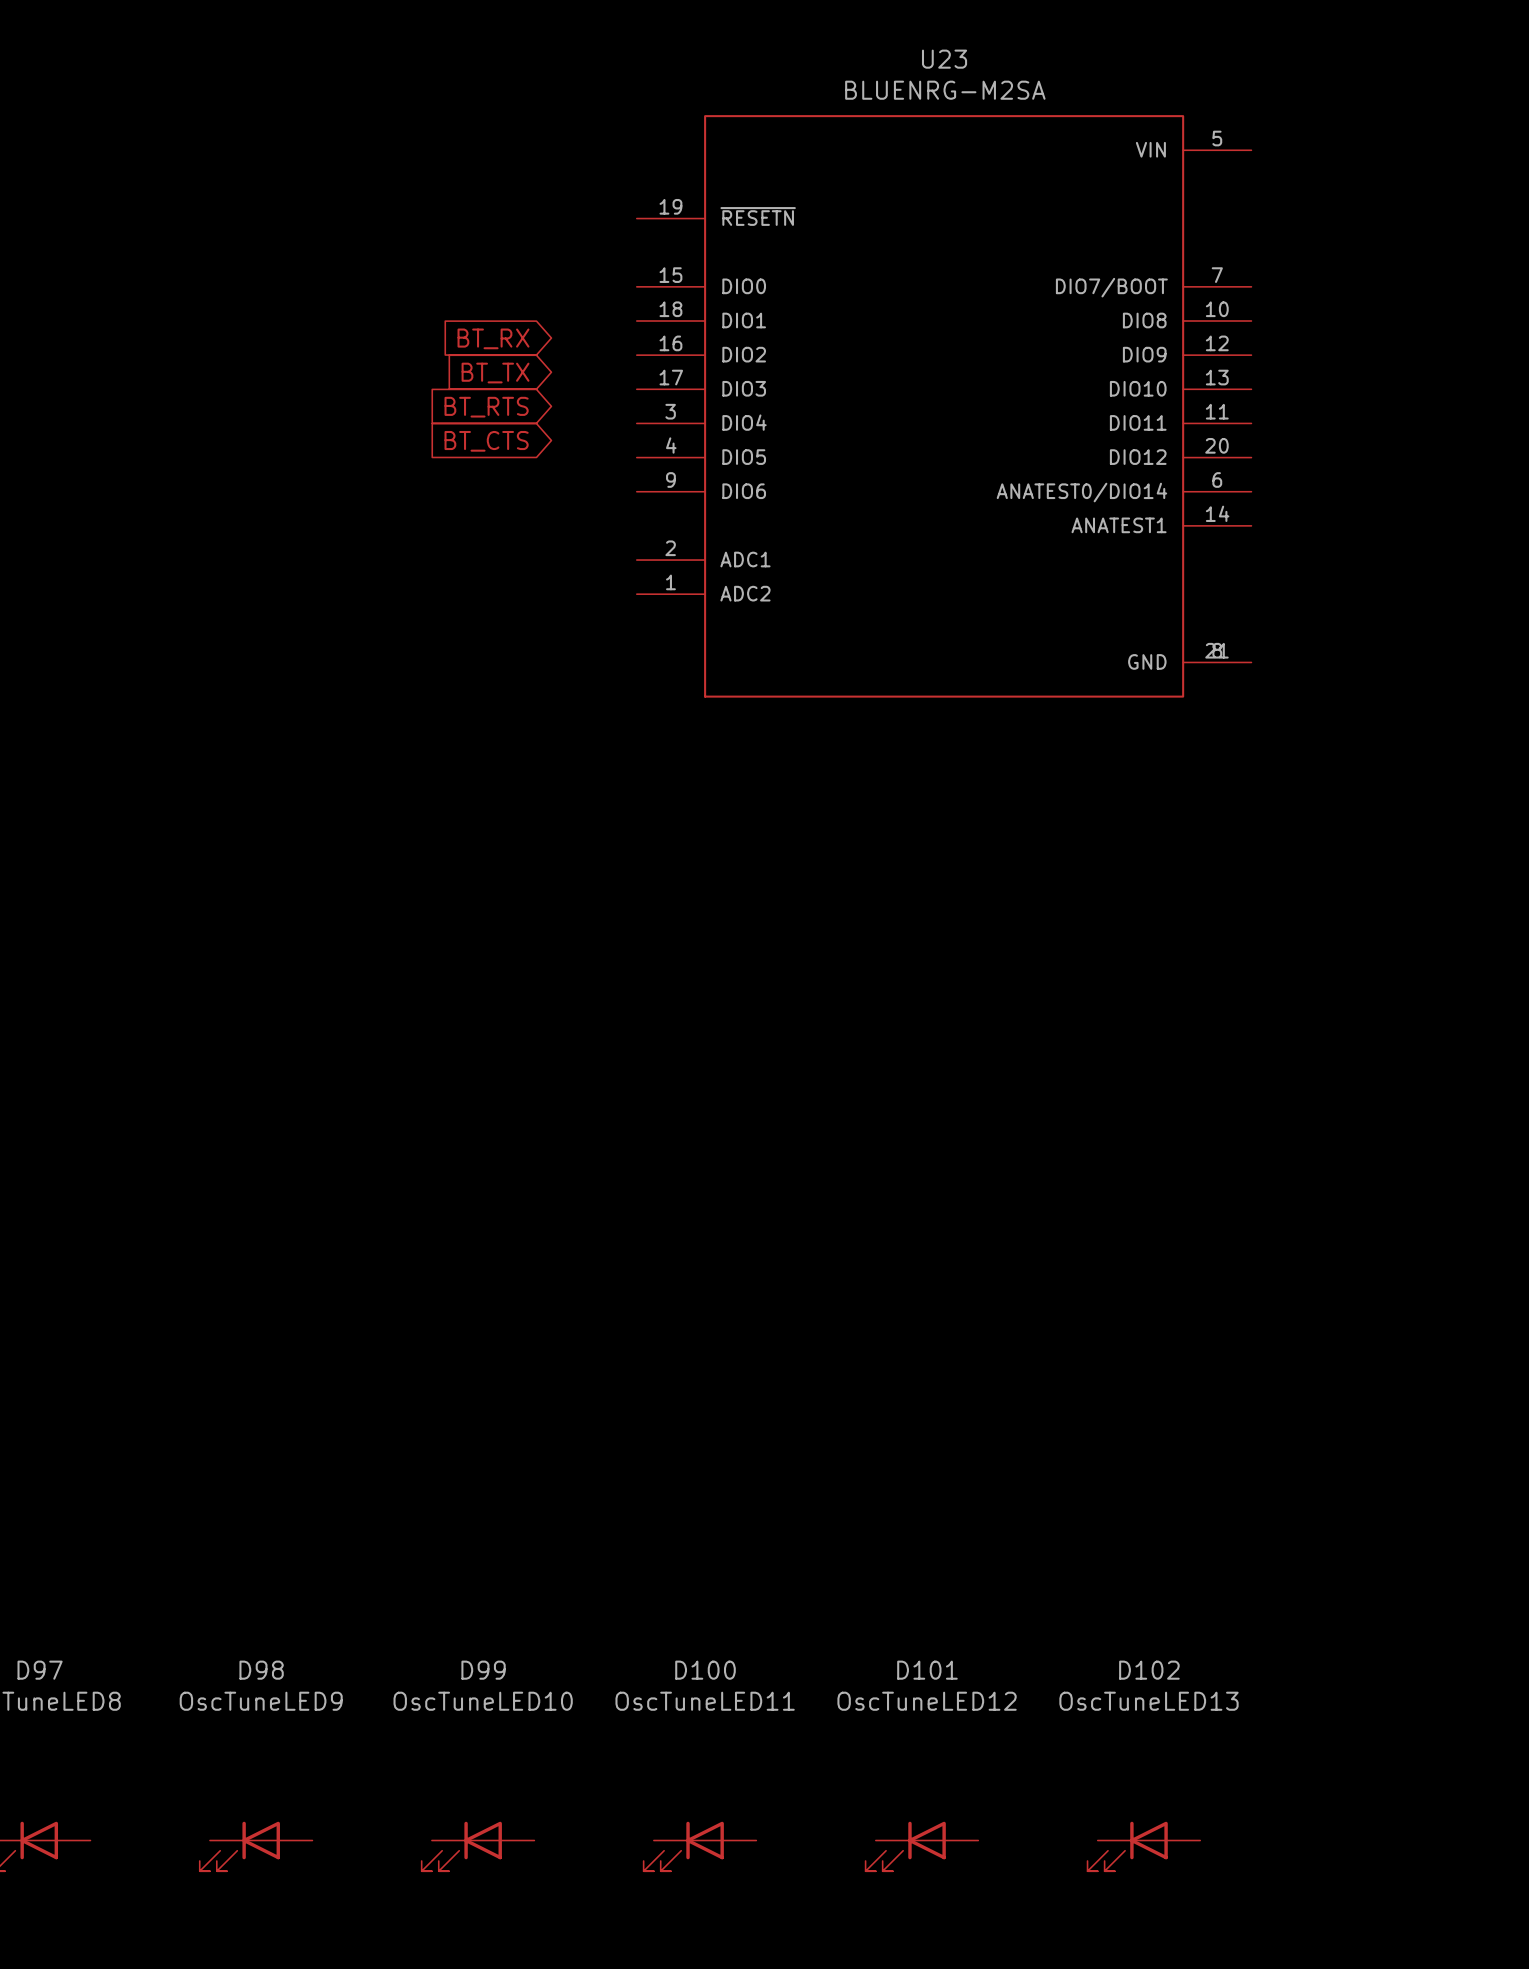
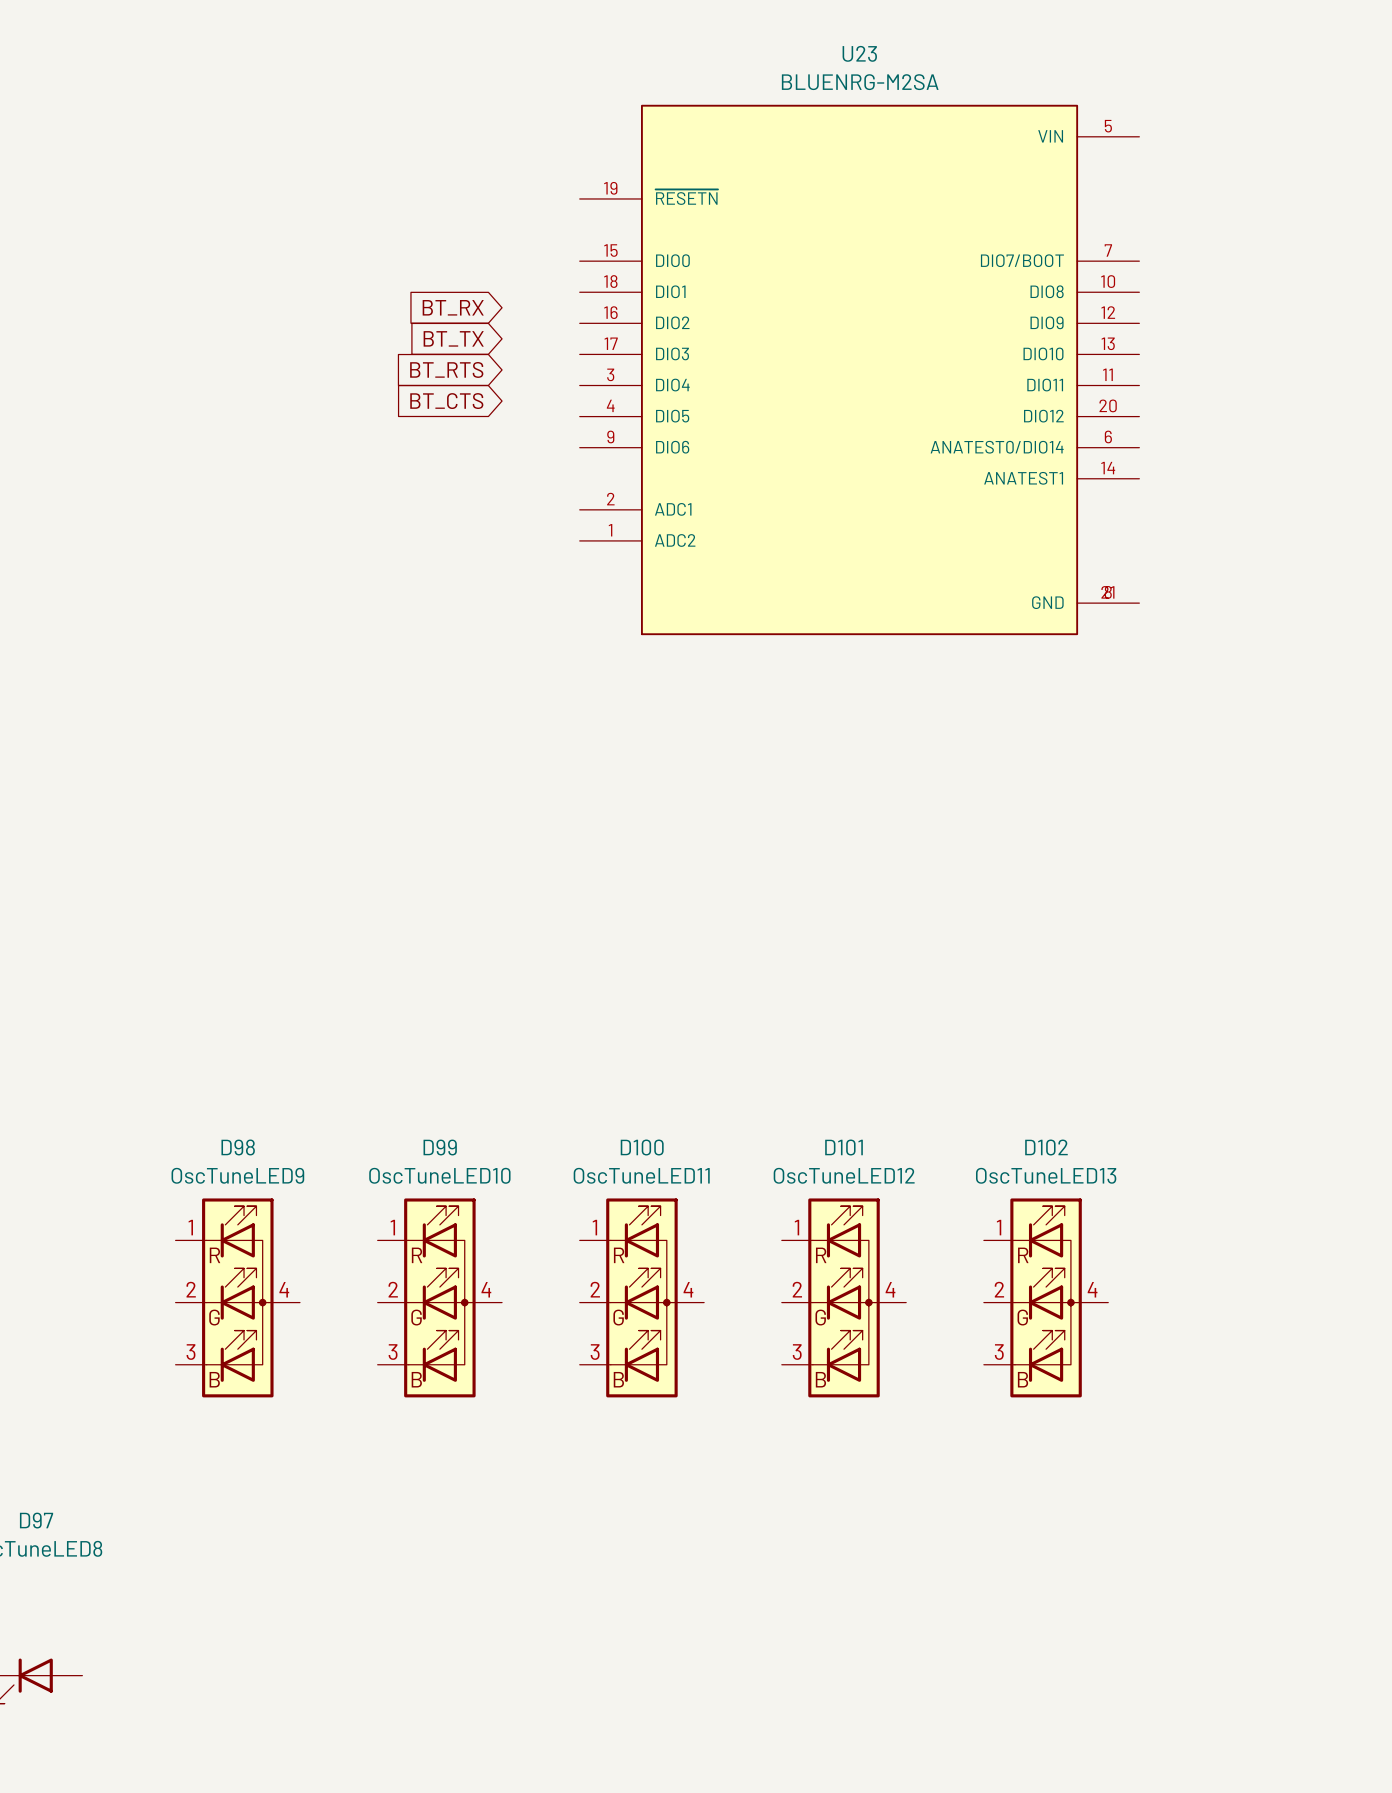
D98 symbol: [199, 1821, 313, 1872] -> [175, 1198, 300, 1398]
D99 symbol: [421, 1821, 535, 1872] -> [377, 1198, 503, 1398]
D100 symbol: [643, 1821, 757, 1872] -> [579, 1198, 705, 1398]
D101 symbol: [865, 1821, 979, 1872] -> [781, 1198, 907, 1398]
D102 symbol: [1087, 1821, 1201, 1872] -> [983, 1198, 1109, 1398]

